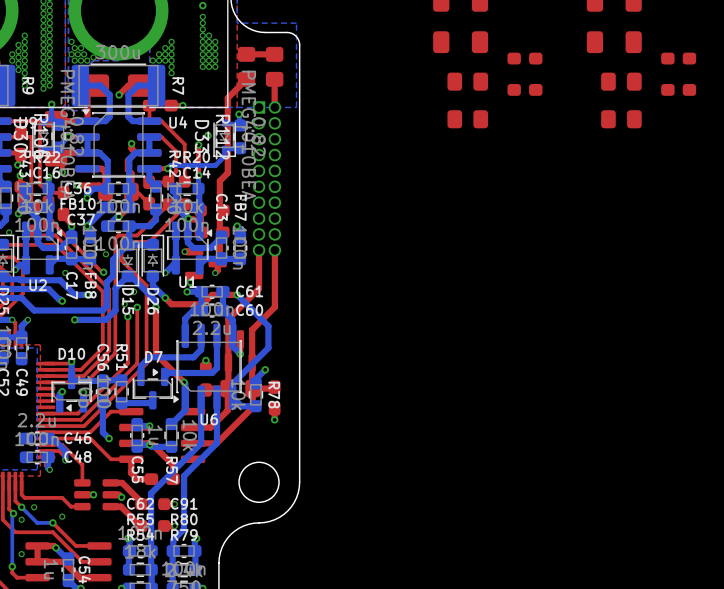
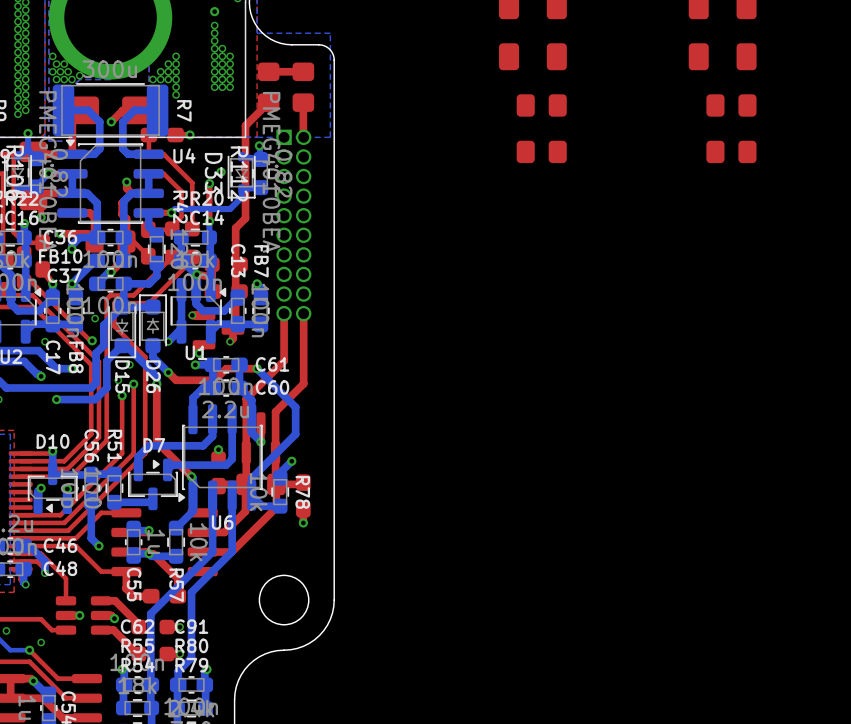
part: (524, 58) -> none
part: (678, 58) -> none
part: (524, 89) -> none
part: (678, 89) -> none

